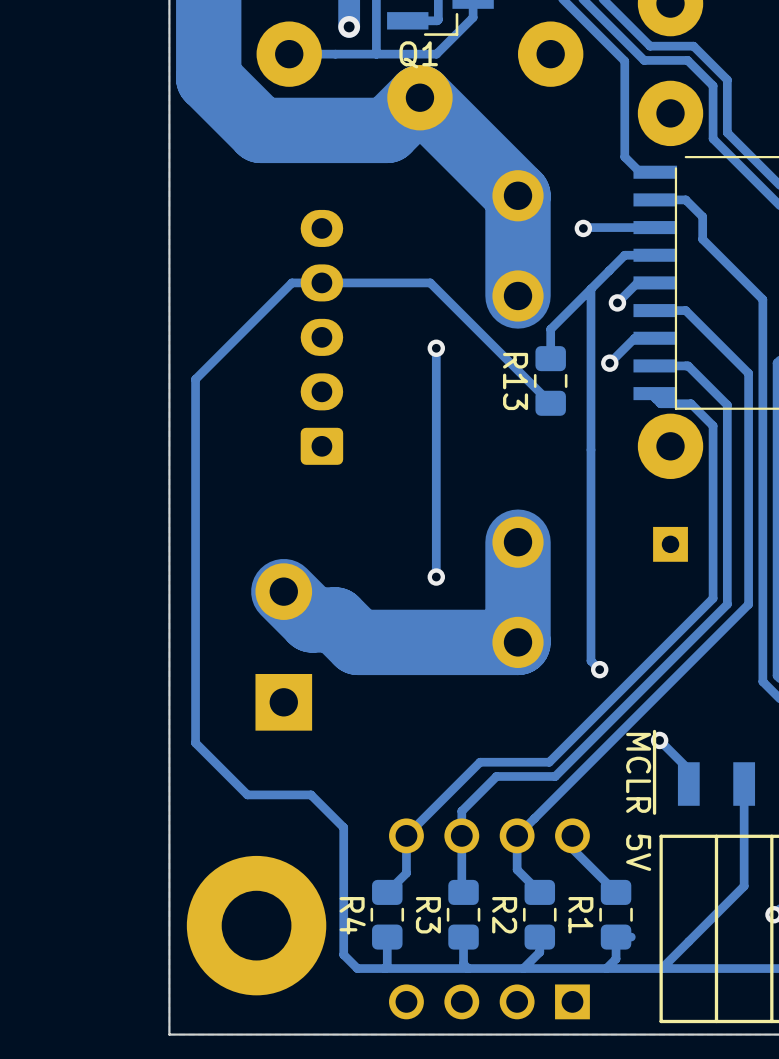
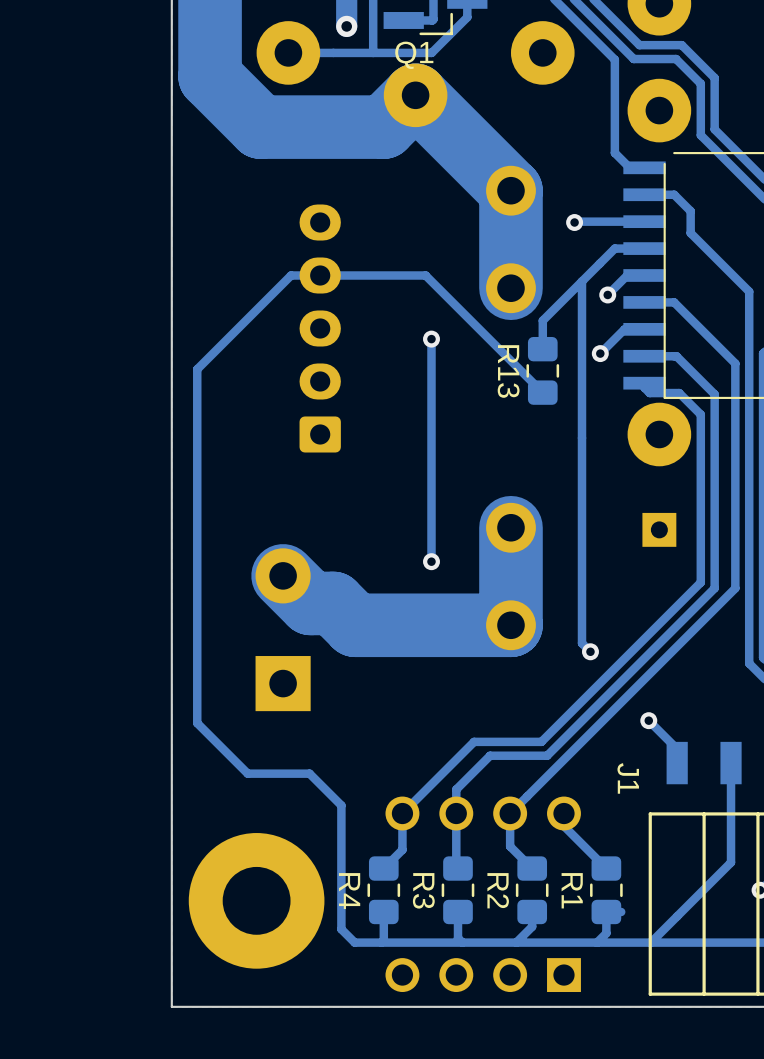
~{MCLR} 5V name: ~{MCLR} 5V (641, 800) -> J1 (628, 778)

